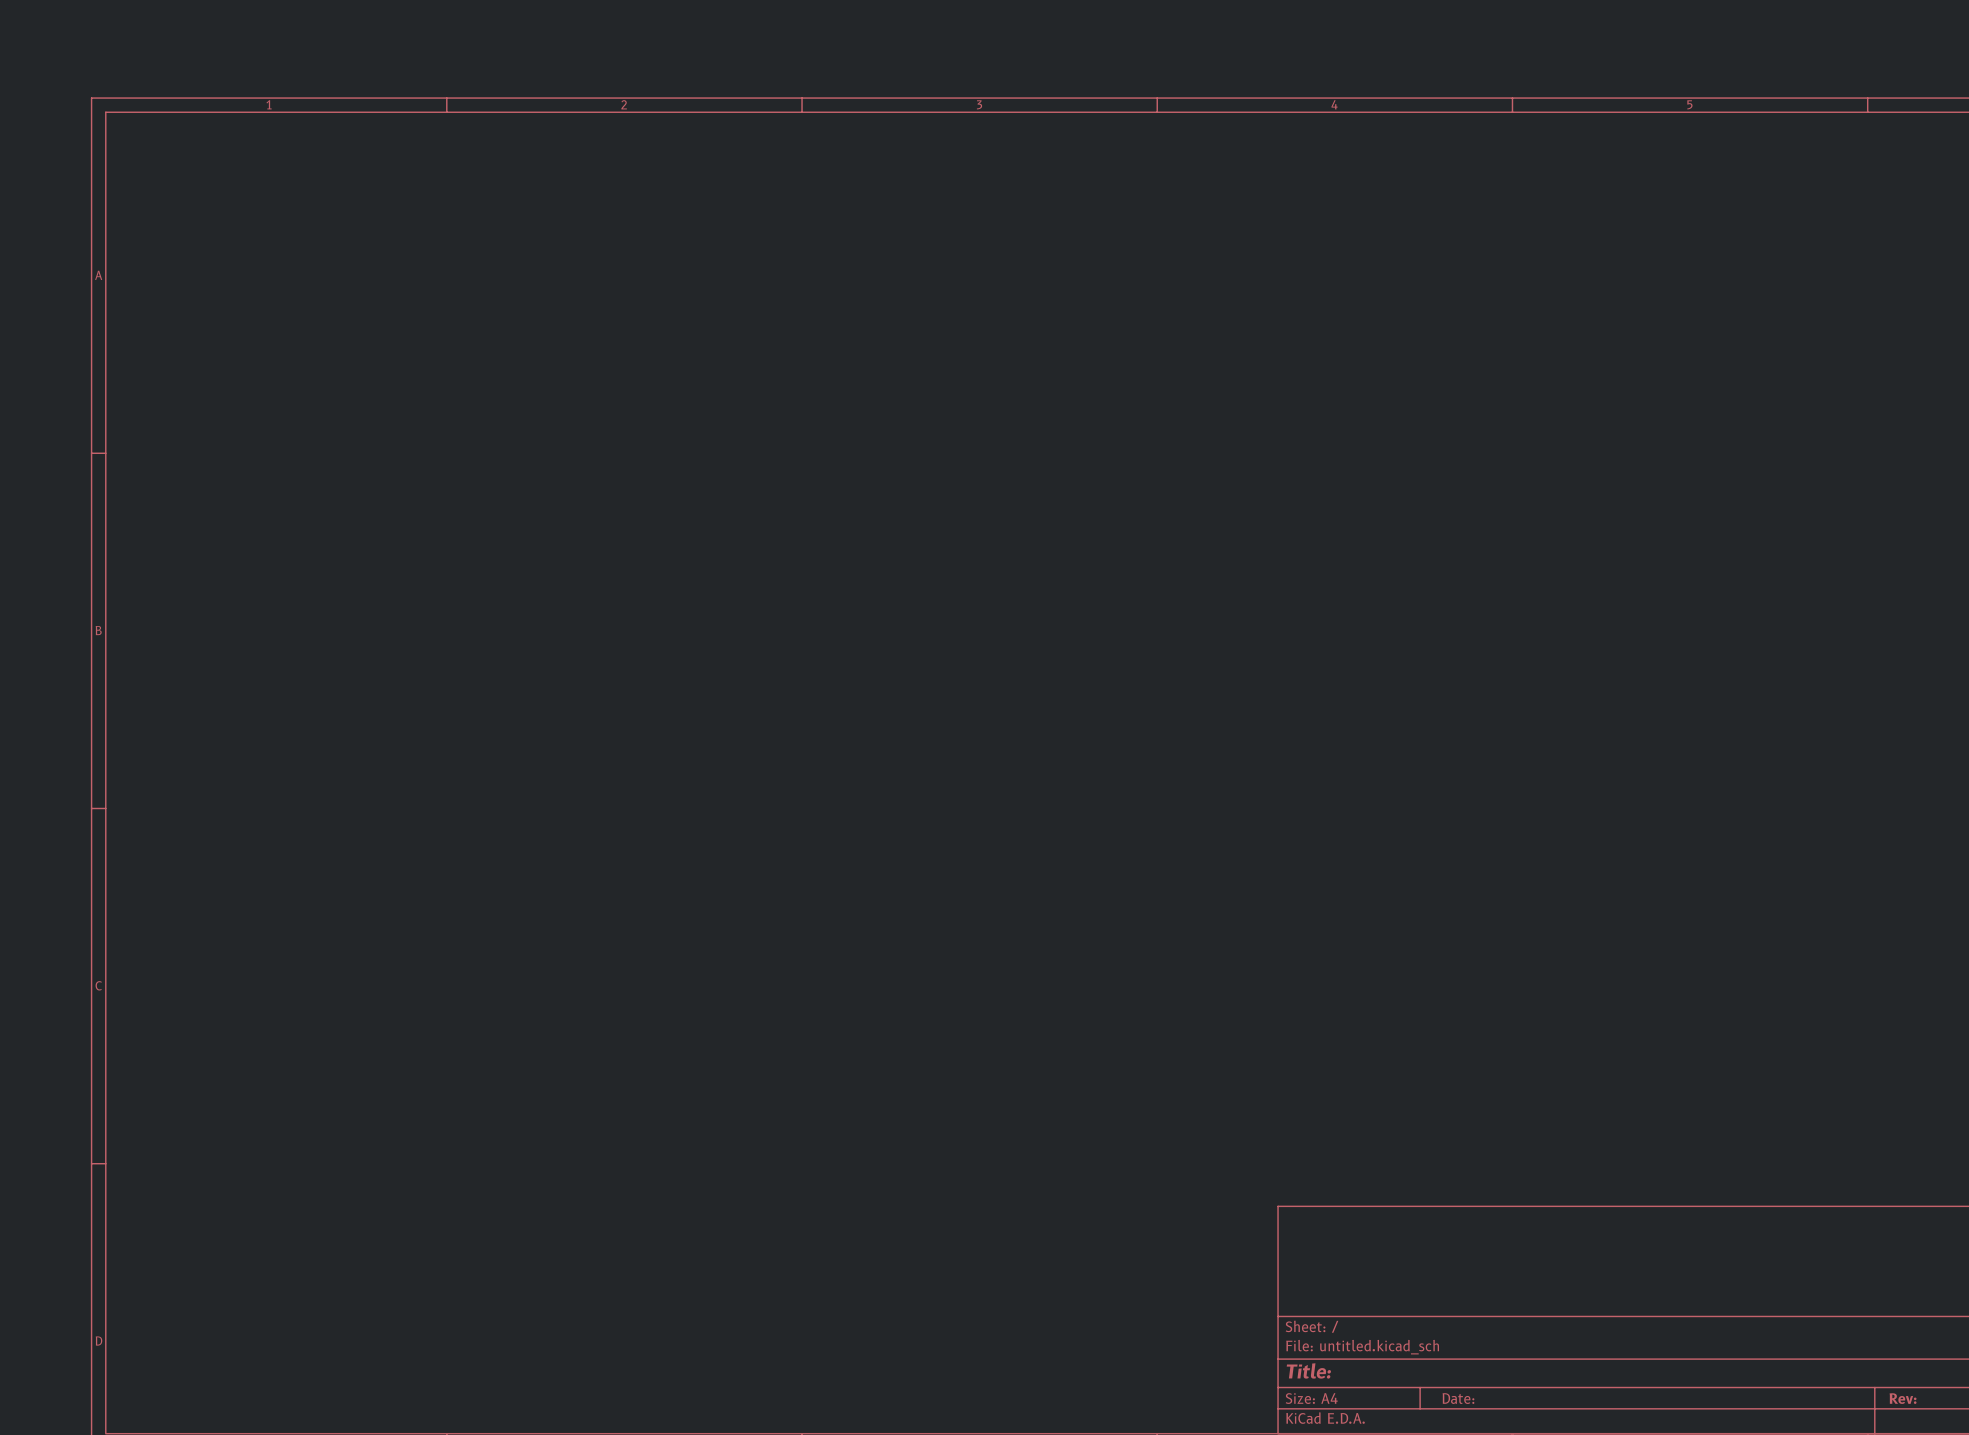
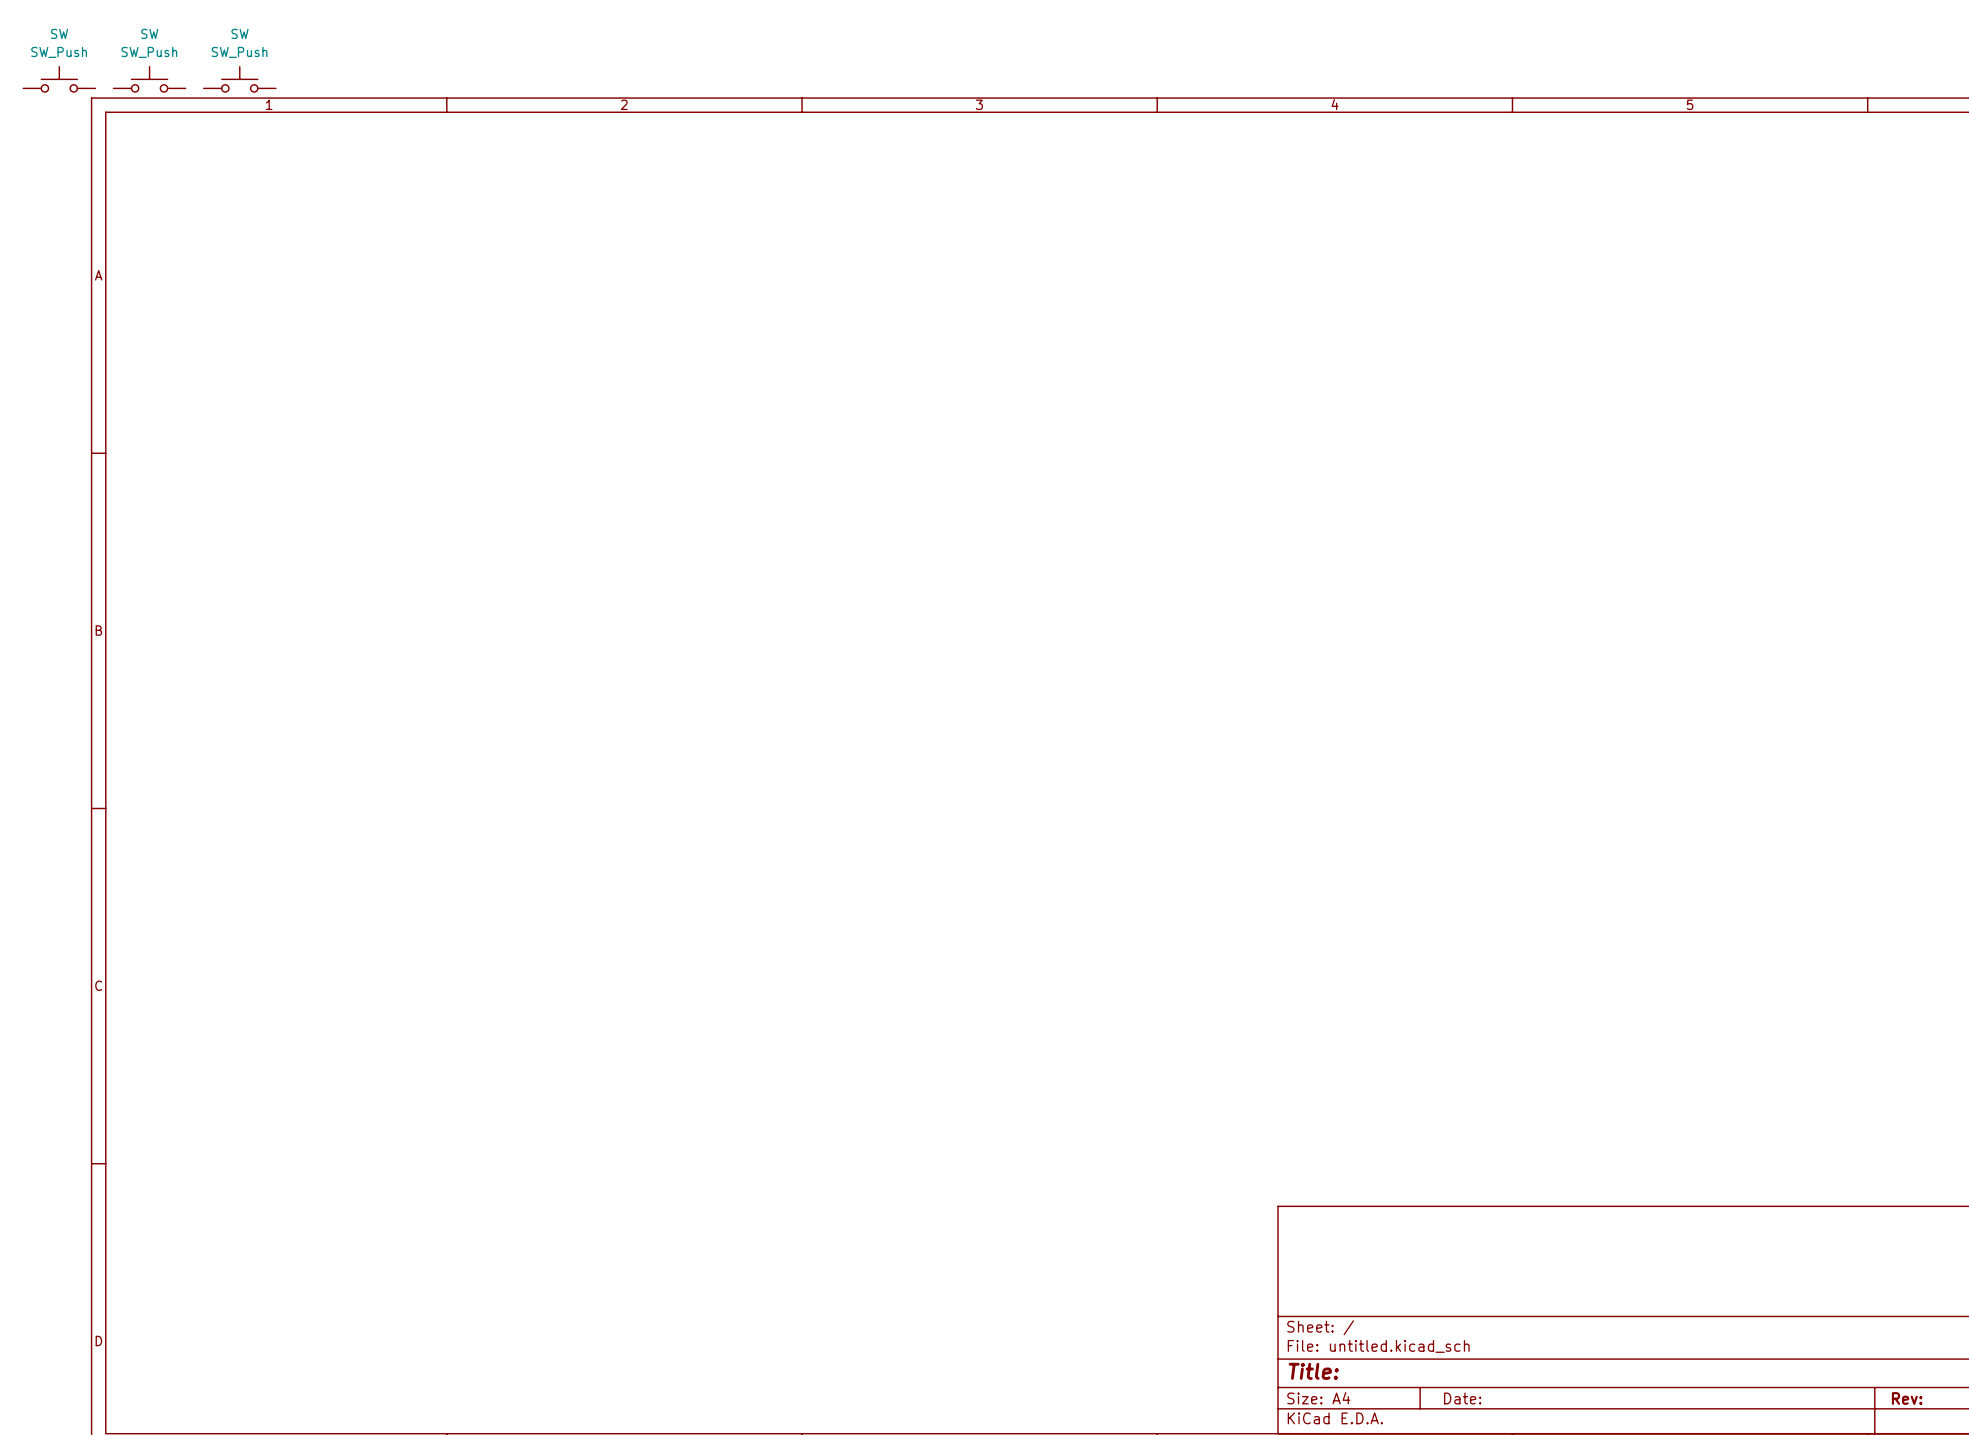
SW: none -> SW_Push (59, 79)
SW: none -> SW_Push (149, 79)
SW: none -> SW_Push (239, 79)

